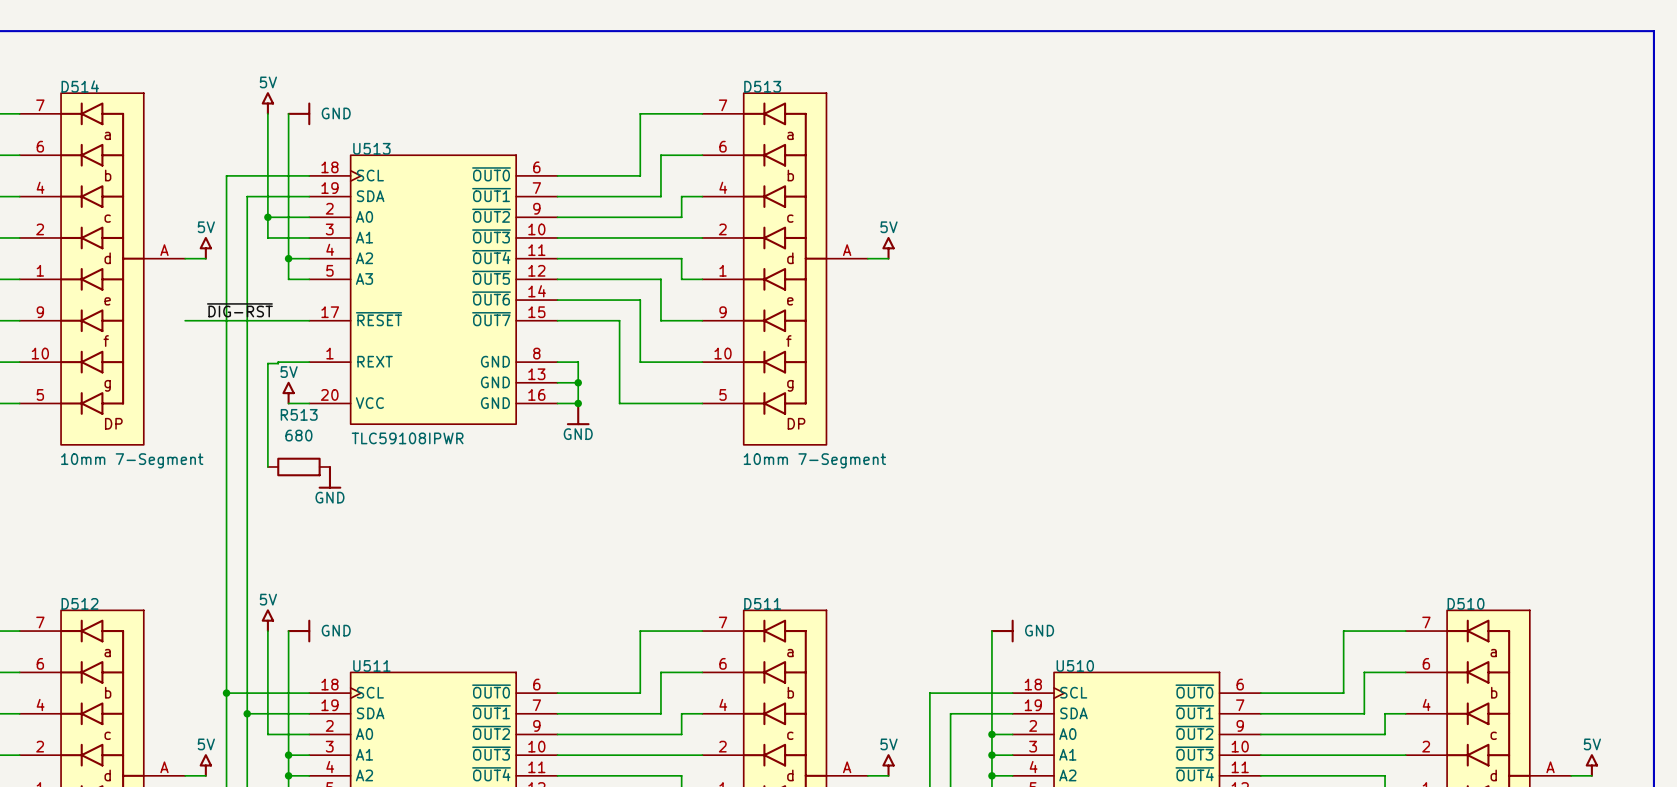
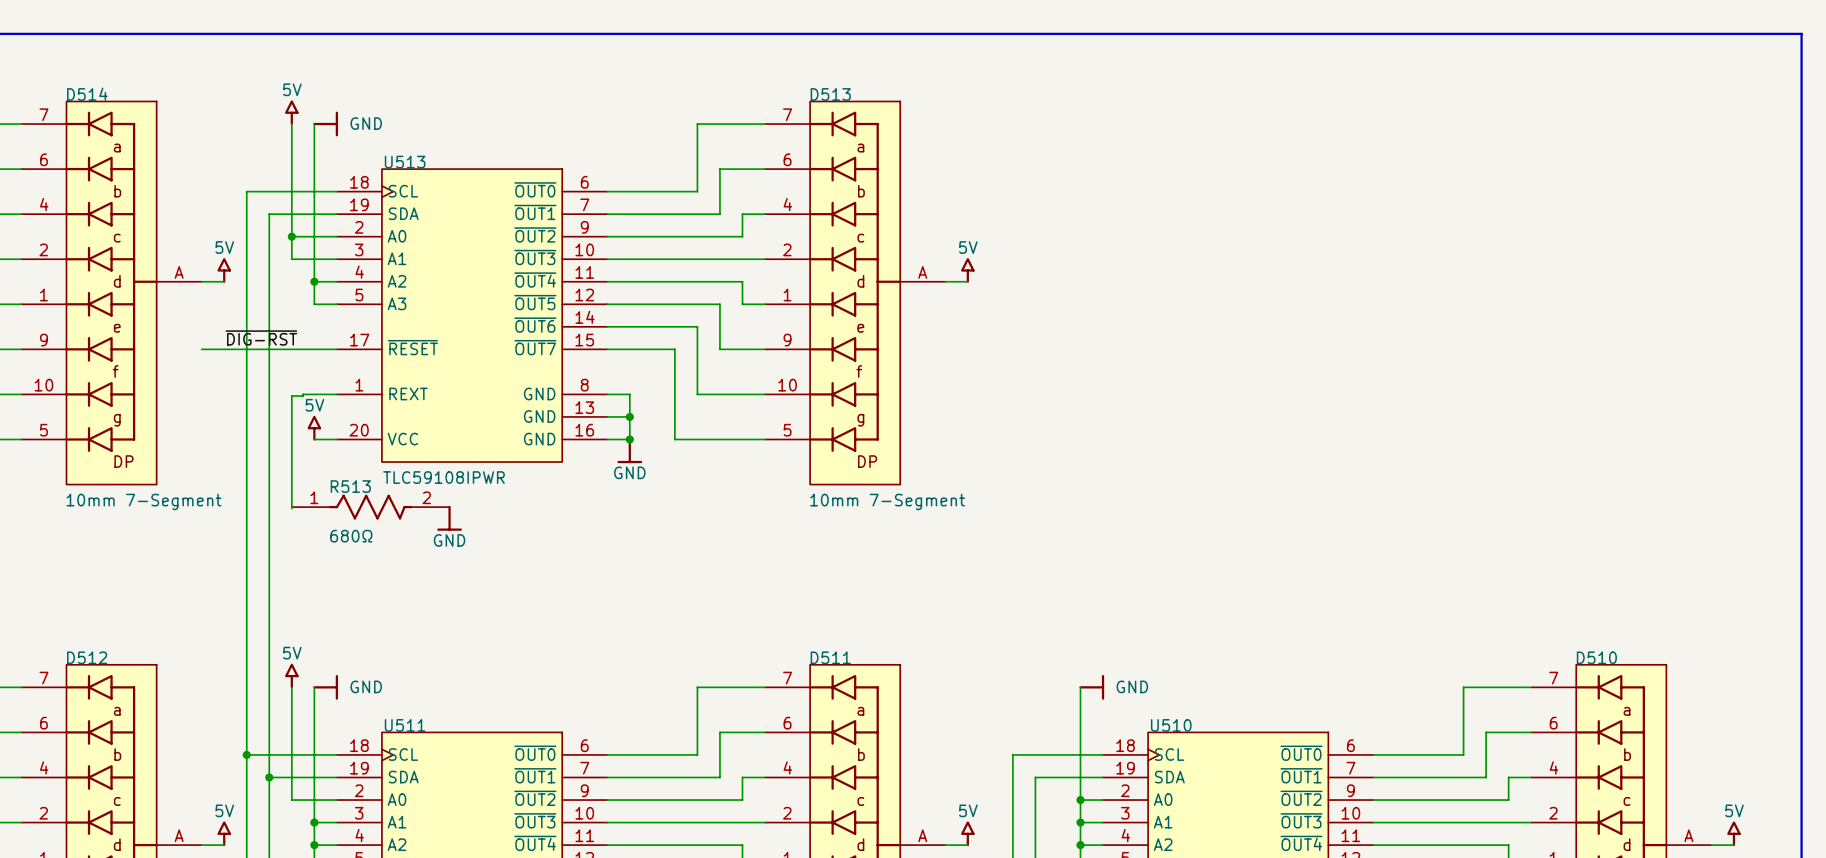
R513 name position: R513 (299, 414) -> R513 (350, 486)
R513 value: 680 (298, 435) -> 680Ω (351, 536)
R513 symbol: [267, 457, 330, 477] -> [291, 494, 450, 520]
power symbol position: GND (329, 477) -> GND (449, 518)

